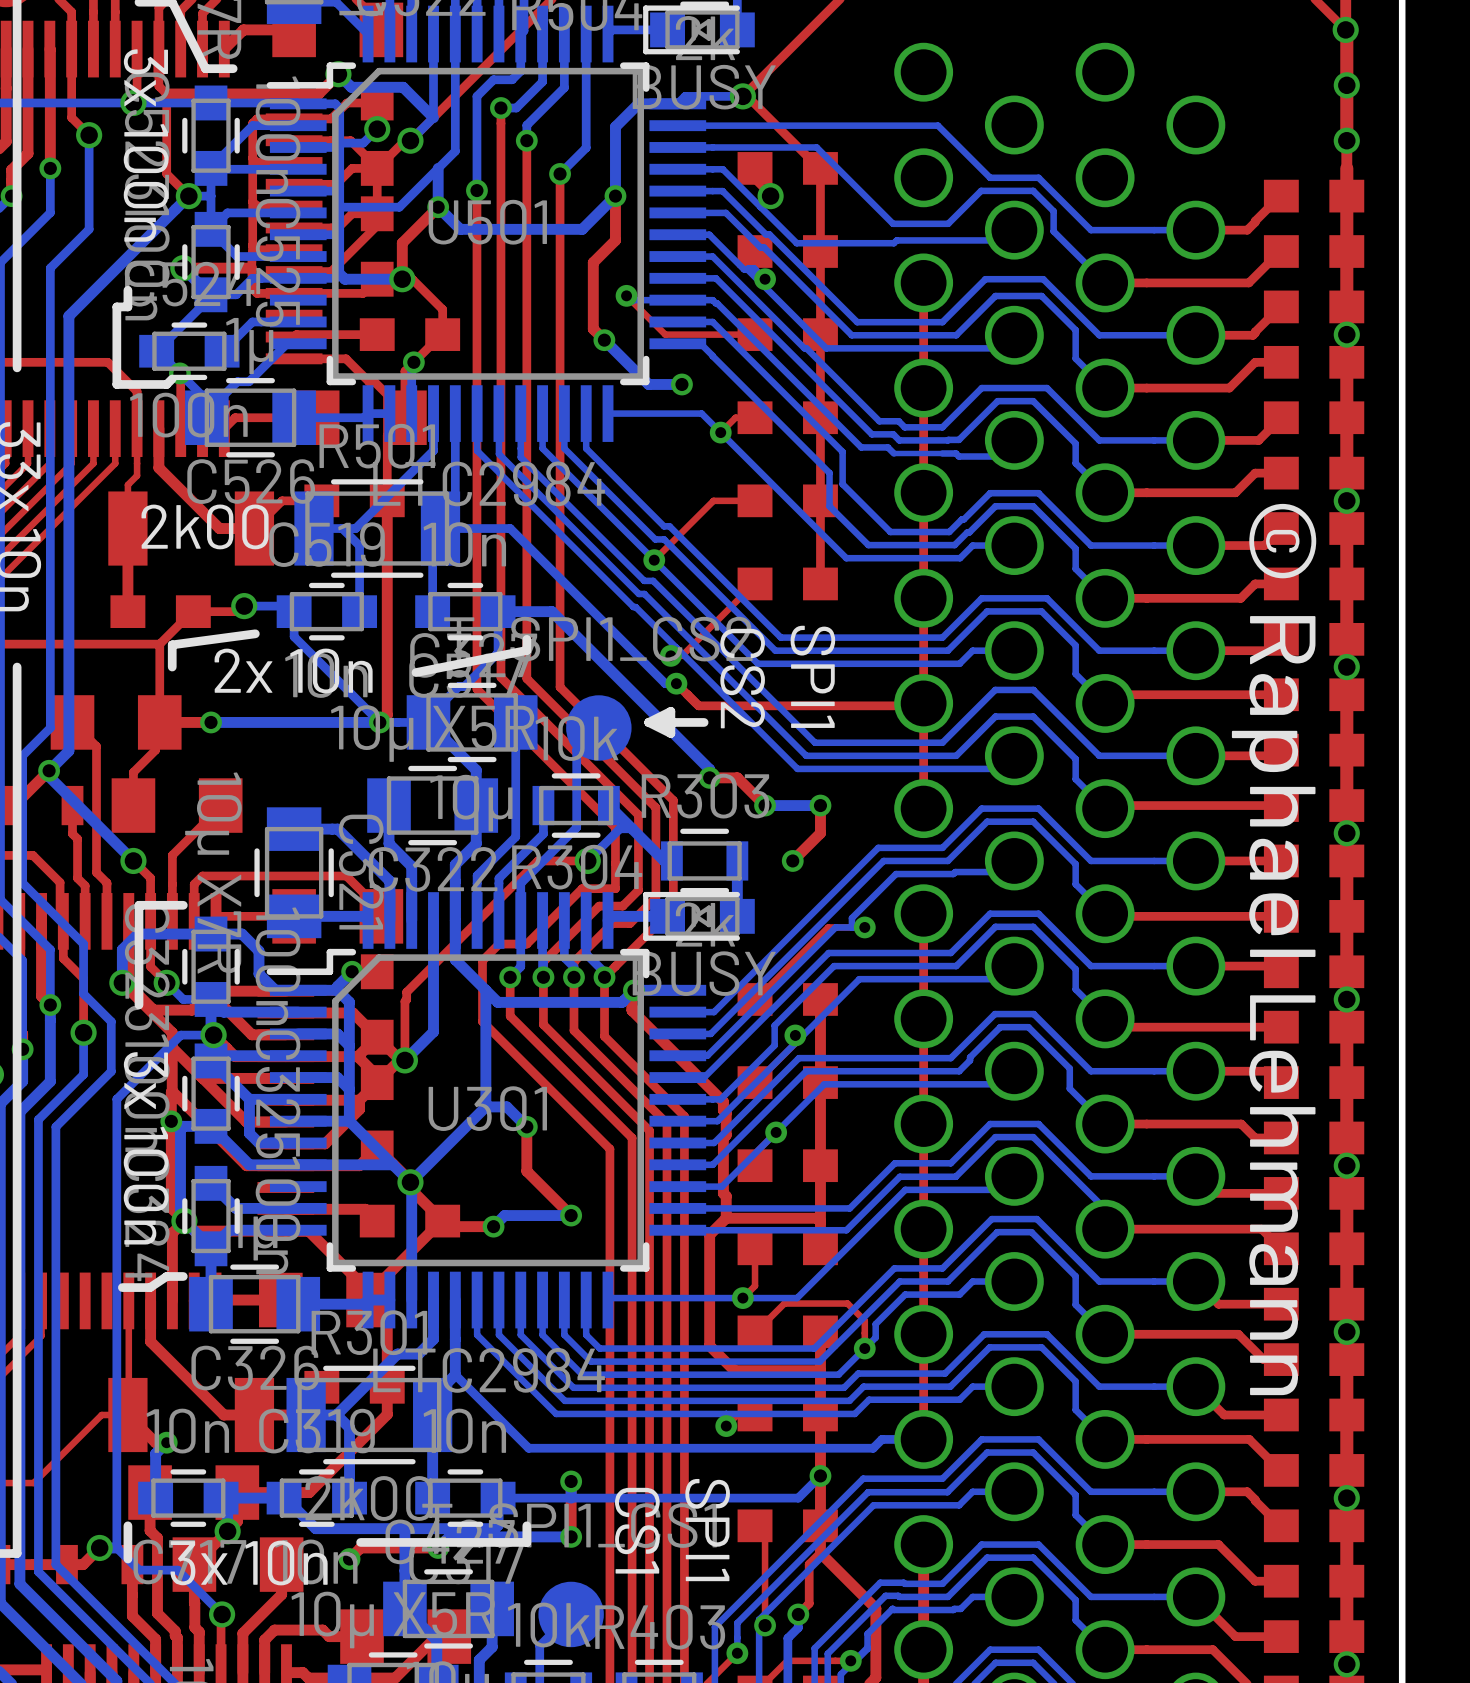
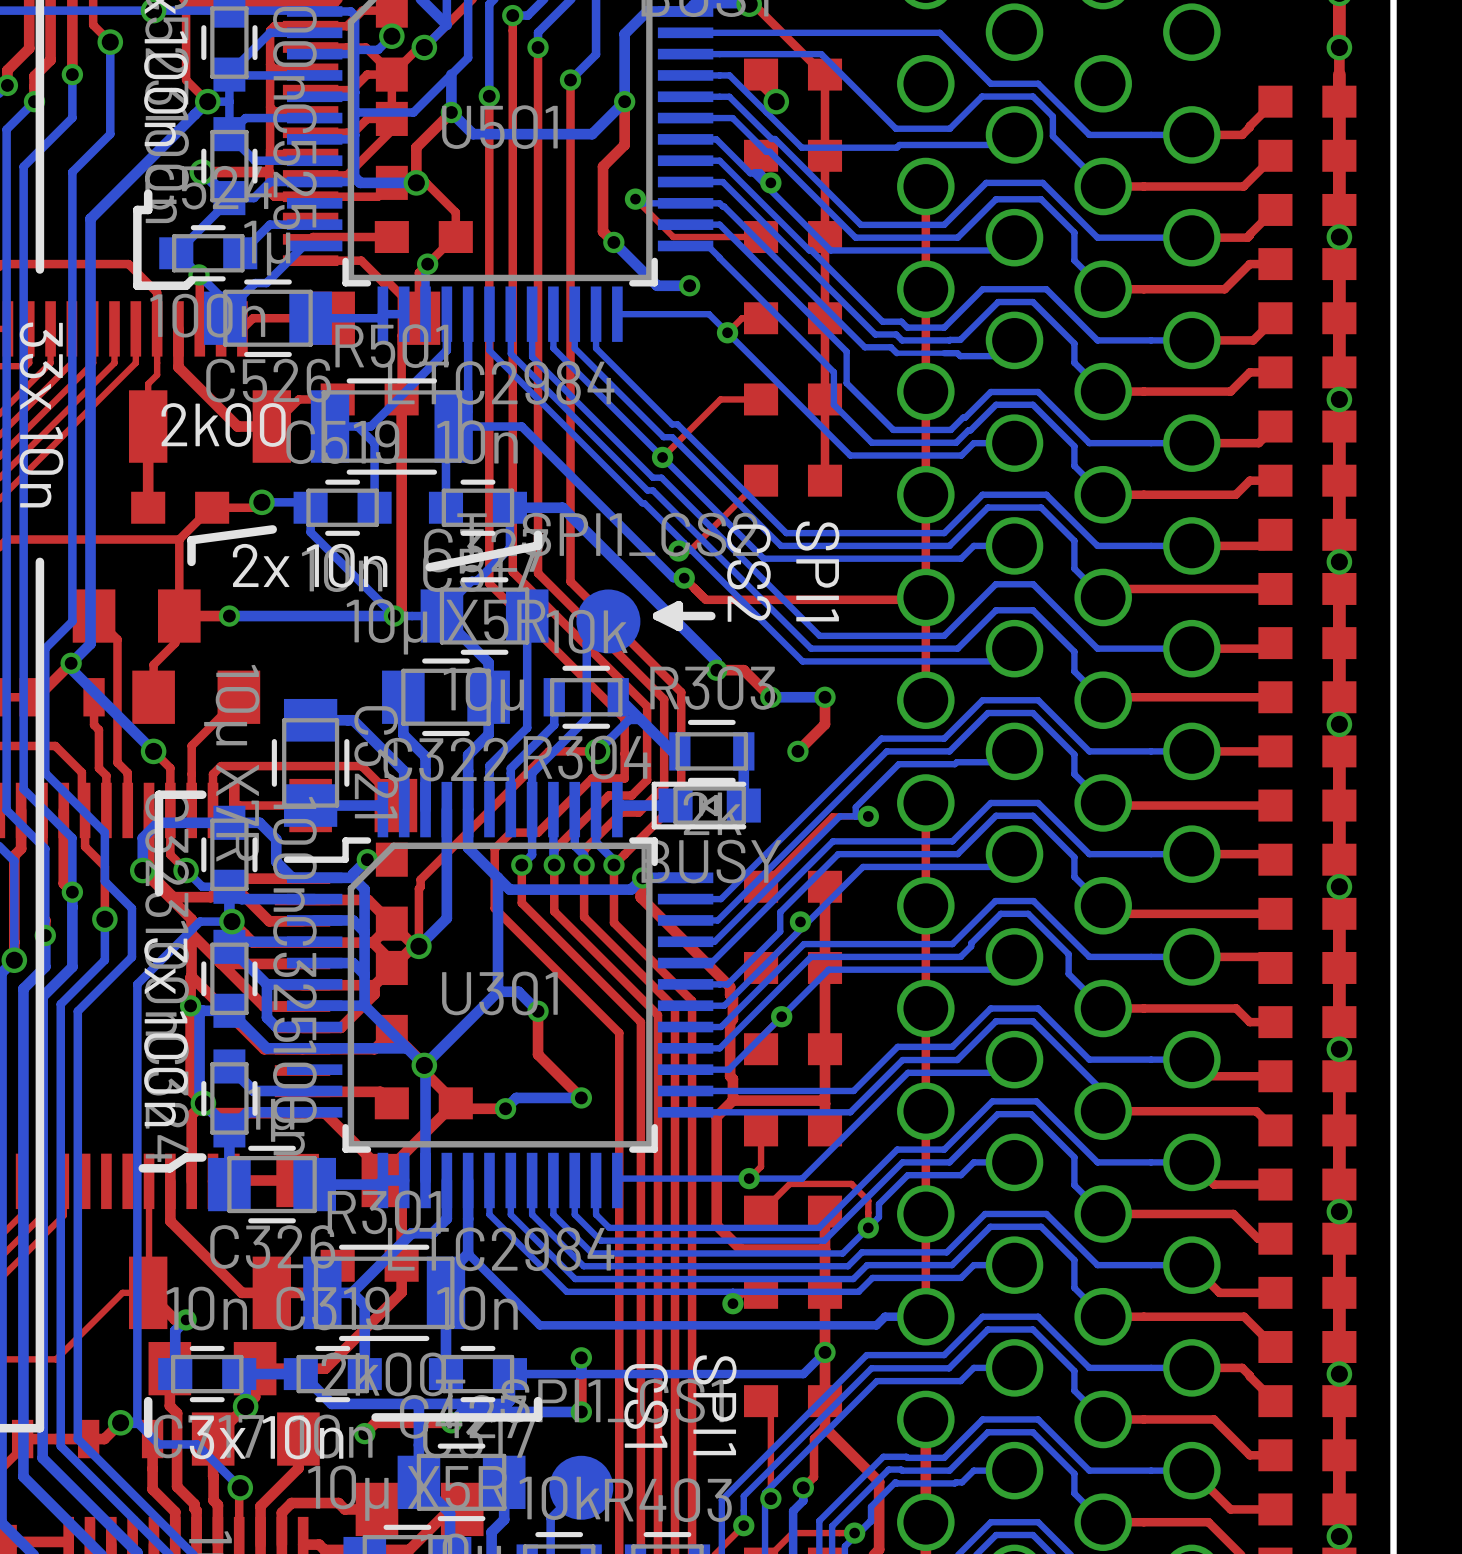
text: © Raphael Lehmann (1274, 949) -> none

